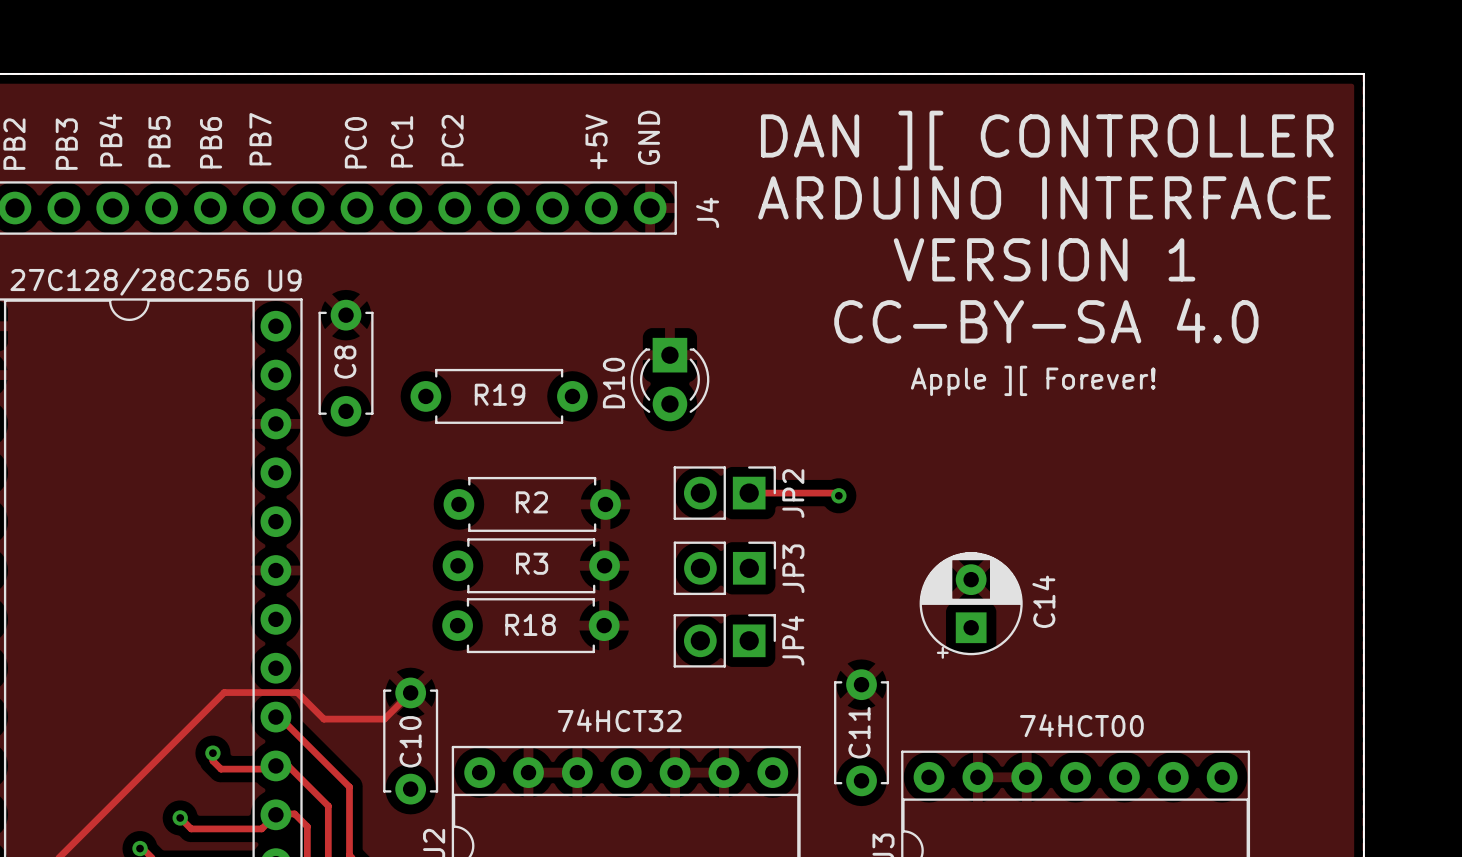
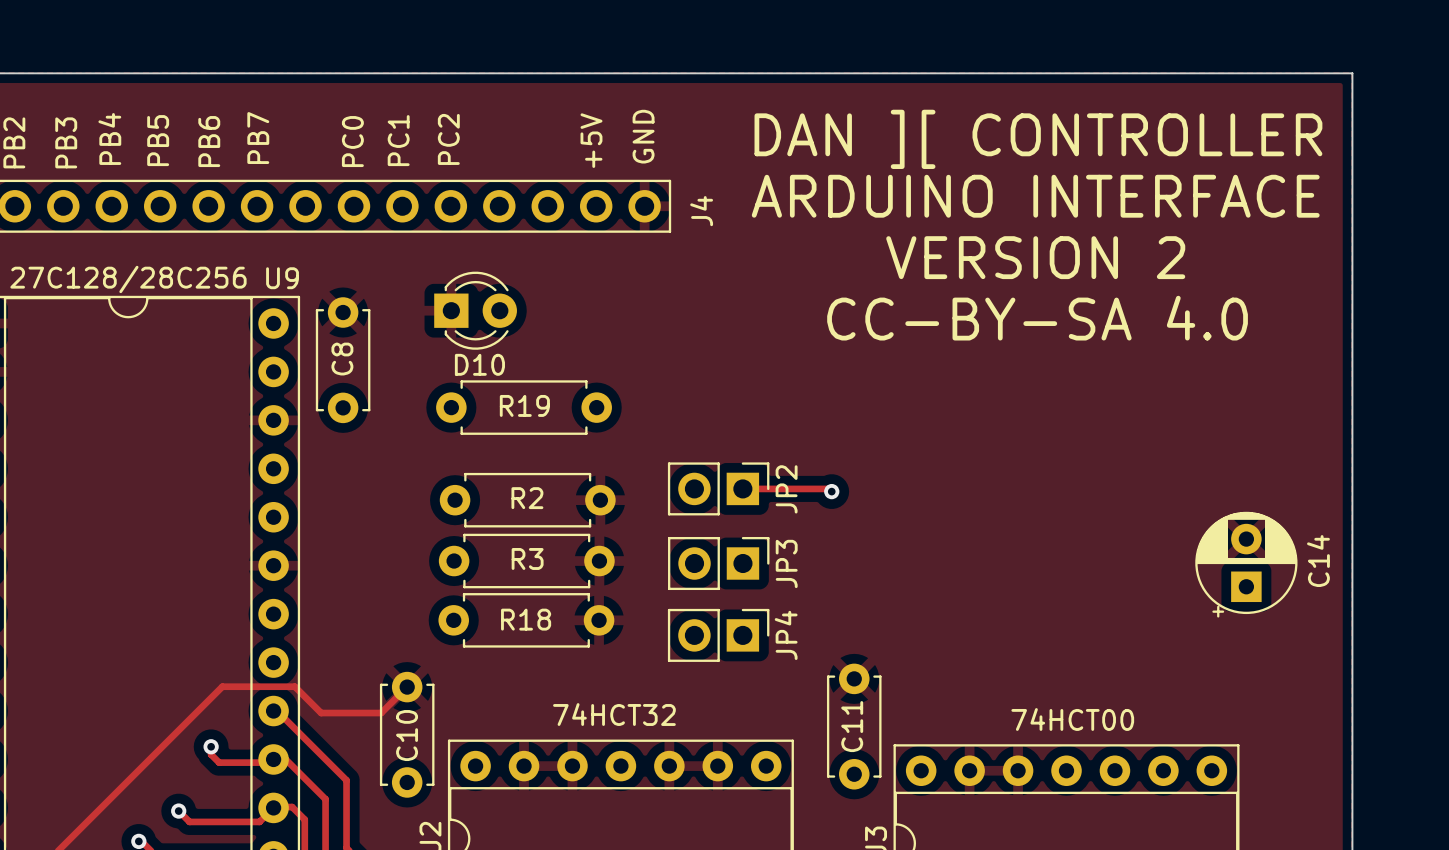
text: VERSION 1 (1044, 259) -> VERSION 2 (1035, 257)
D10 rotation: 0° (669, 379) -> 90° counterclockwise (475, 310)
D10 position: (669, 379) -> (475, 310)
text: Apple ][ Forever! (1033, 380) -> none
R19 position: (499, 396) -> (524, 407)
C14 position: (971, 605) -> (1246, 564)

